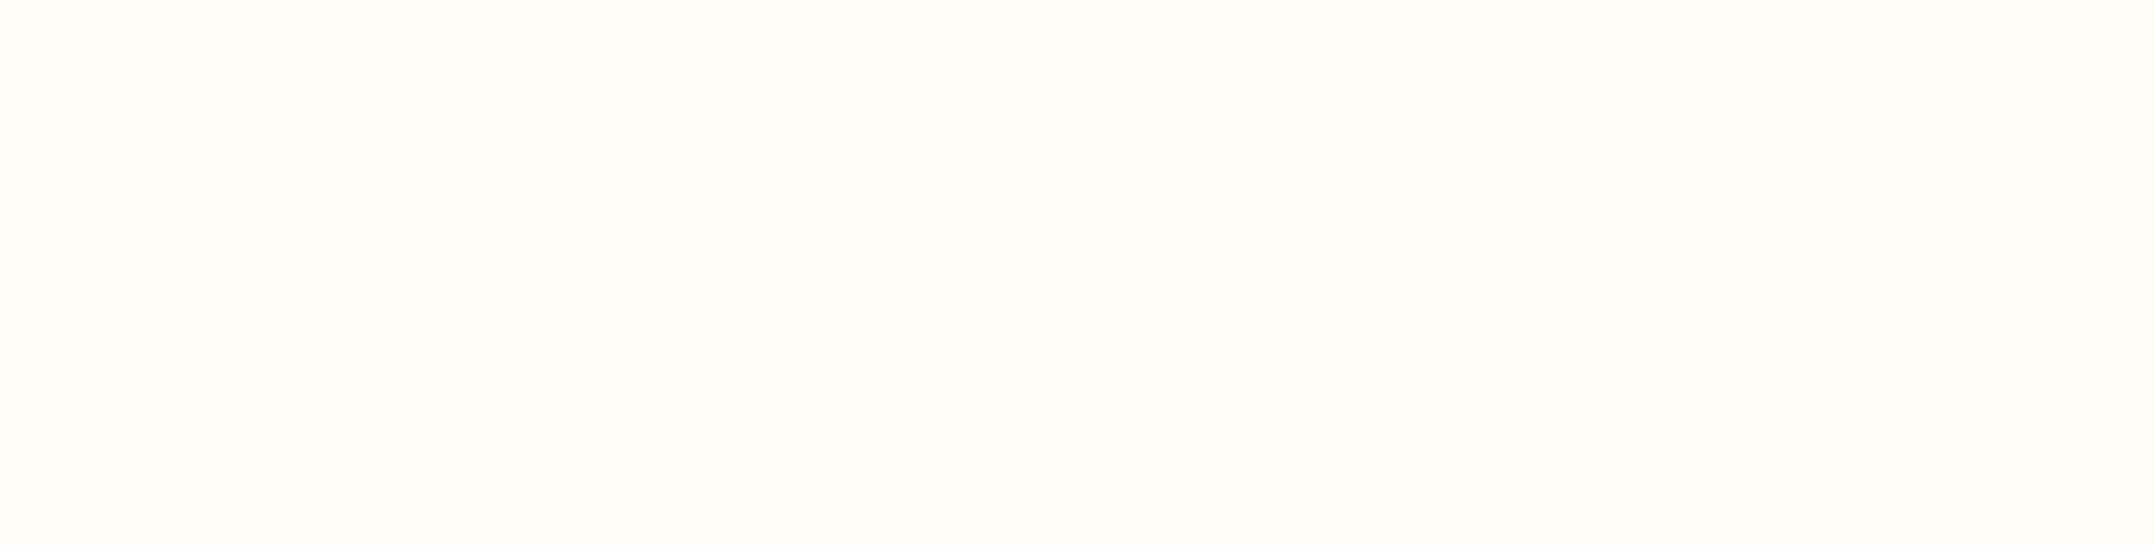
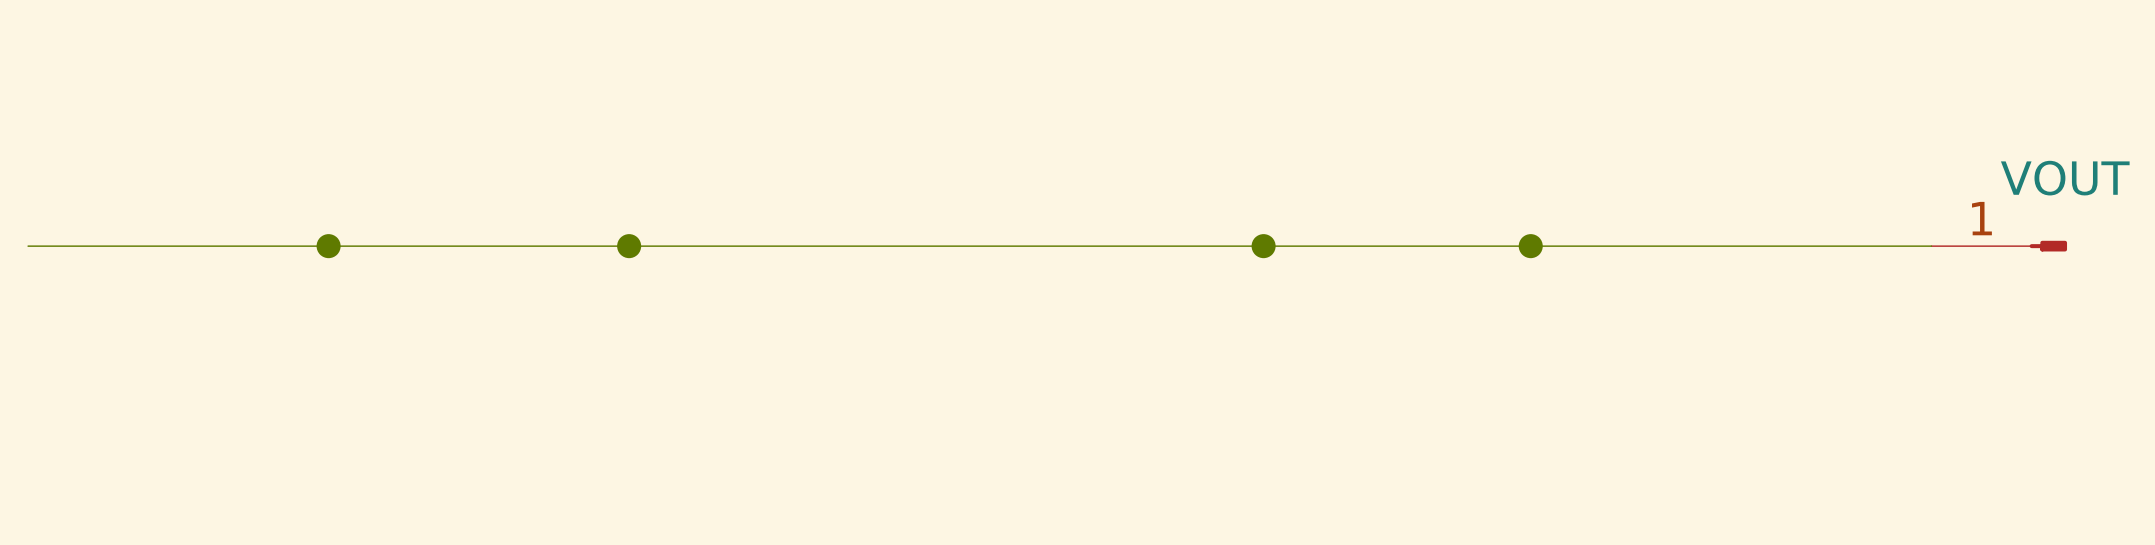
wire: none -> (28, 246) (1931, 246)
junction: none -> (328, 246)
junction: none -> (629, 246)
junction: none -> (1263, 246)
junction: none -> (1530, 246)
part: none -> VOUT (1999, 246)

